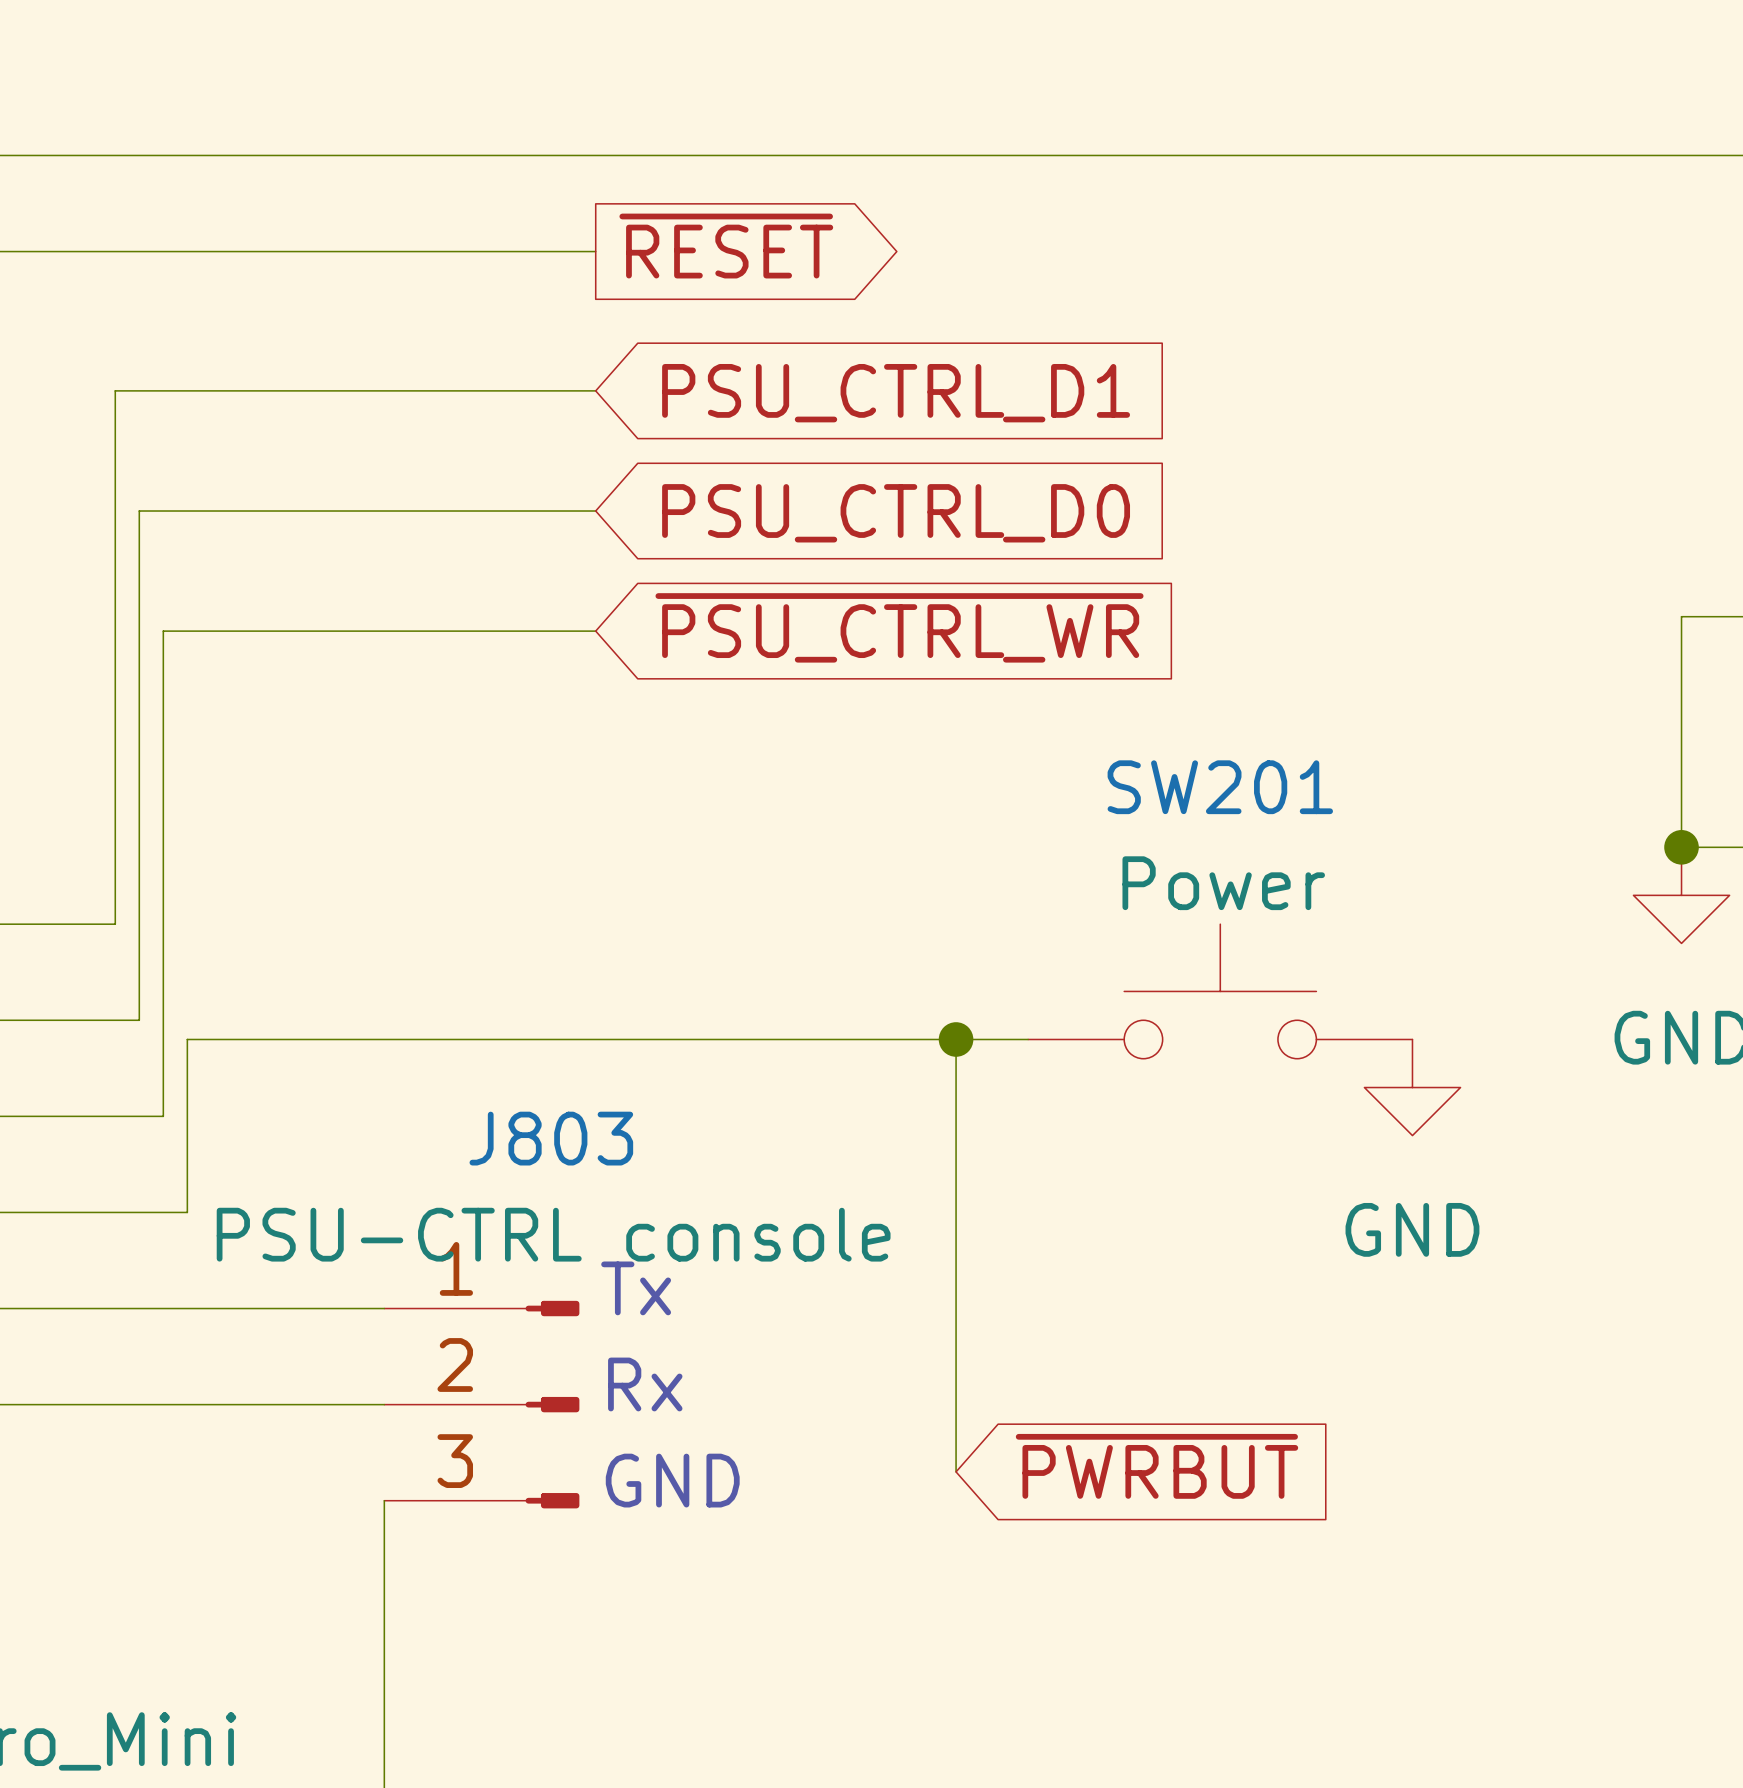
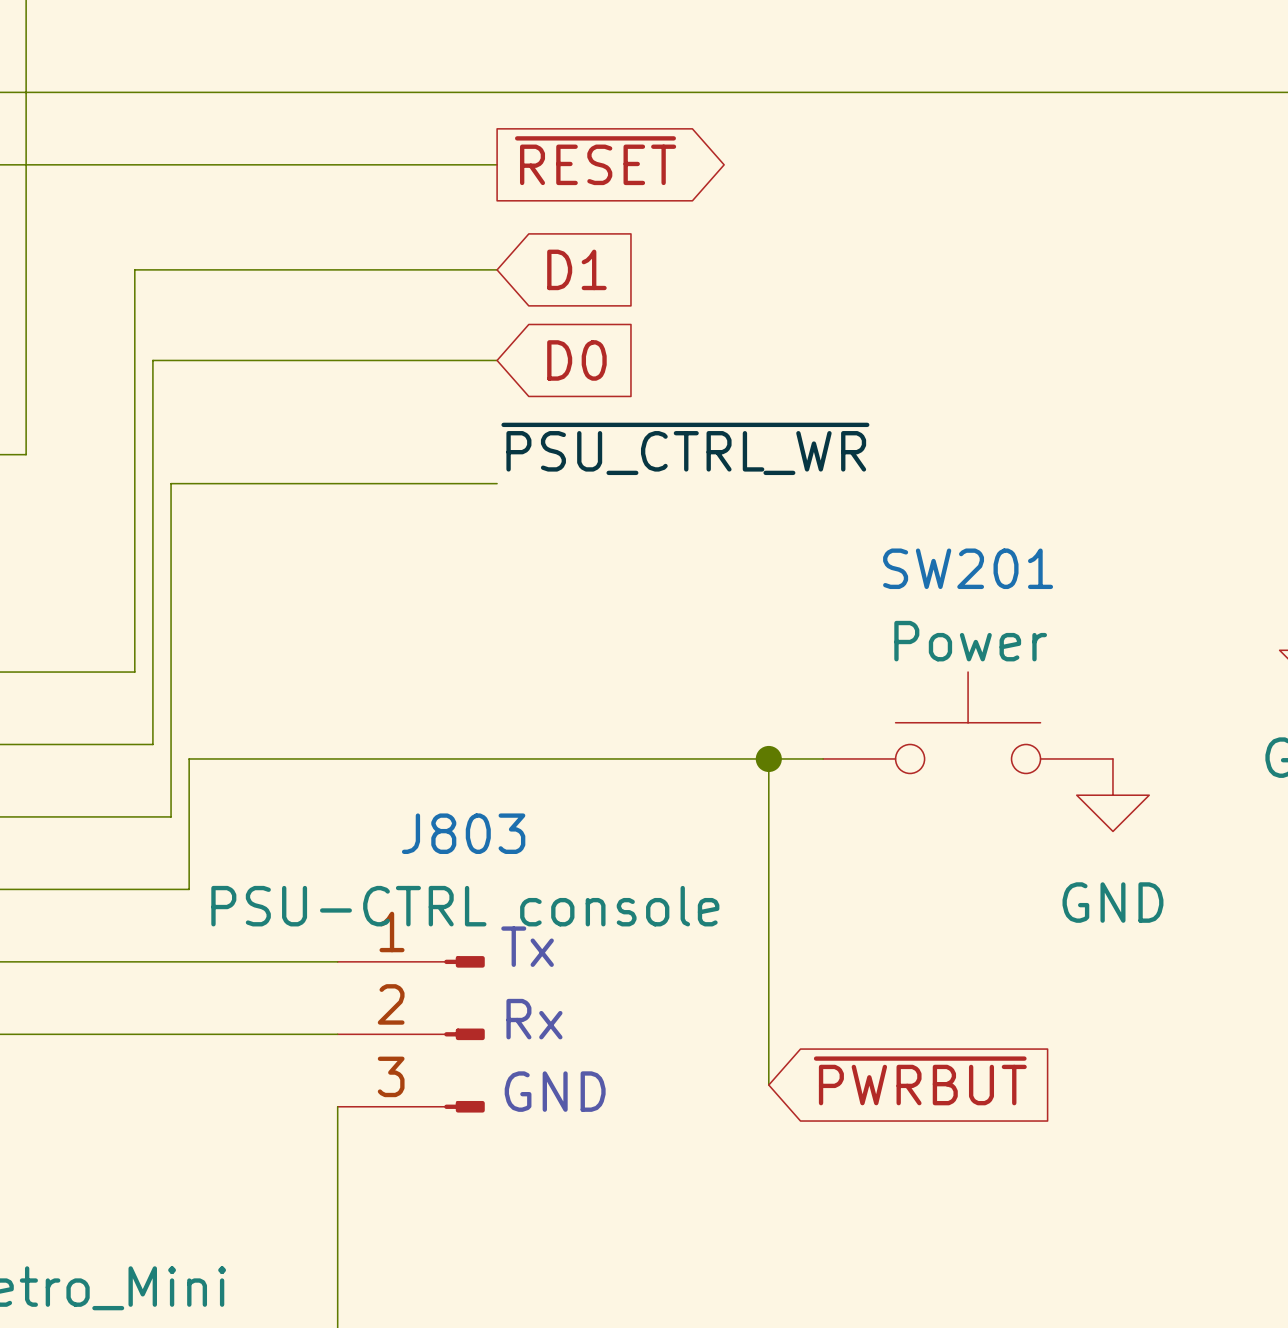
global label: PSU_CTRL_D1 (896, 393) -> D1 (576, 269)
global label: PSU_CTRL_D0 (896, 513) -> D0 (576, 360)
global label: ~{PSU_CTRL_WR} (899, 627) -> none
label: none -> ~{PSU_CTRL_WR} (685, 448)
wire: (595, 631) (163, 631) (163, 674) -> (497, 483) (171, 483)

